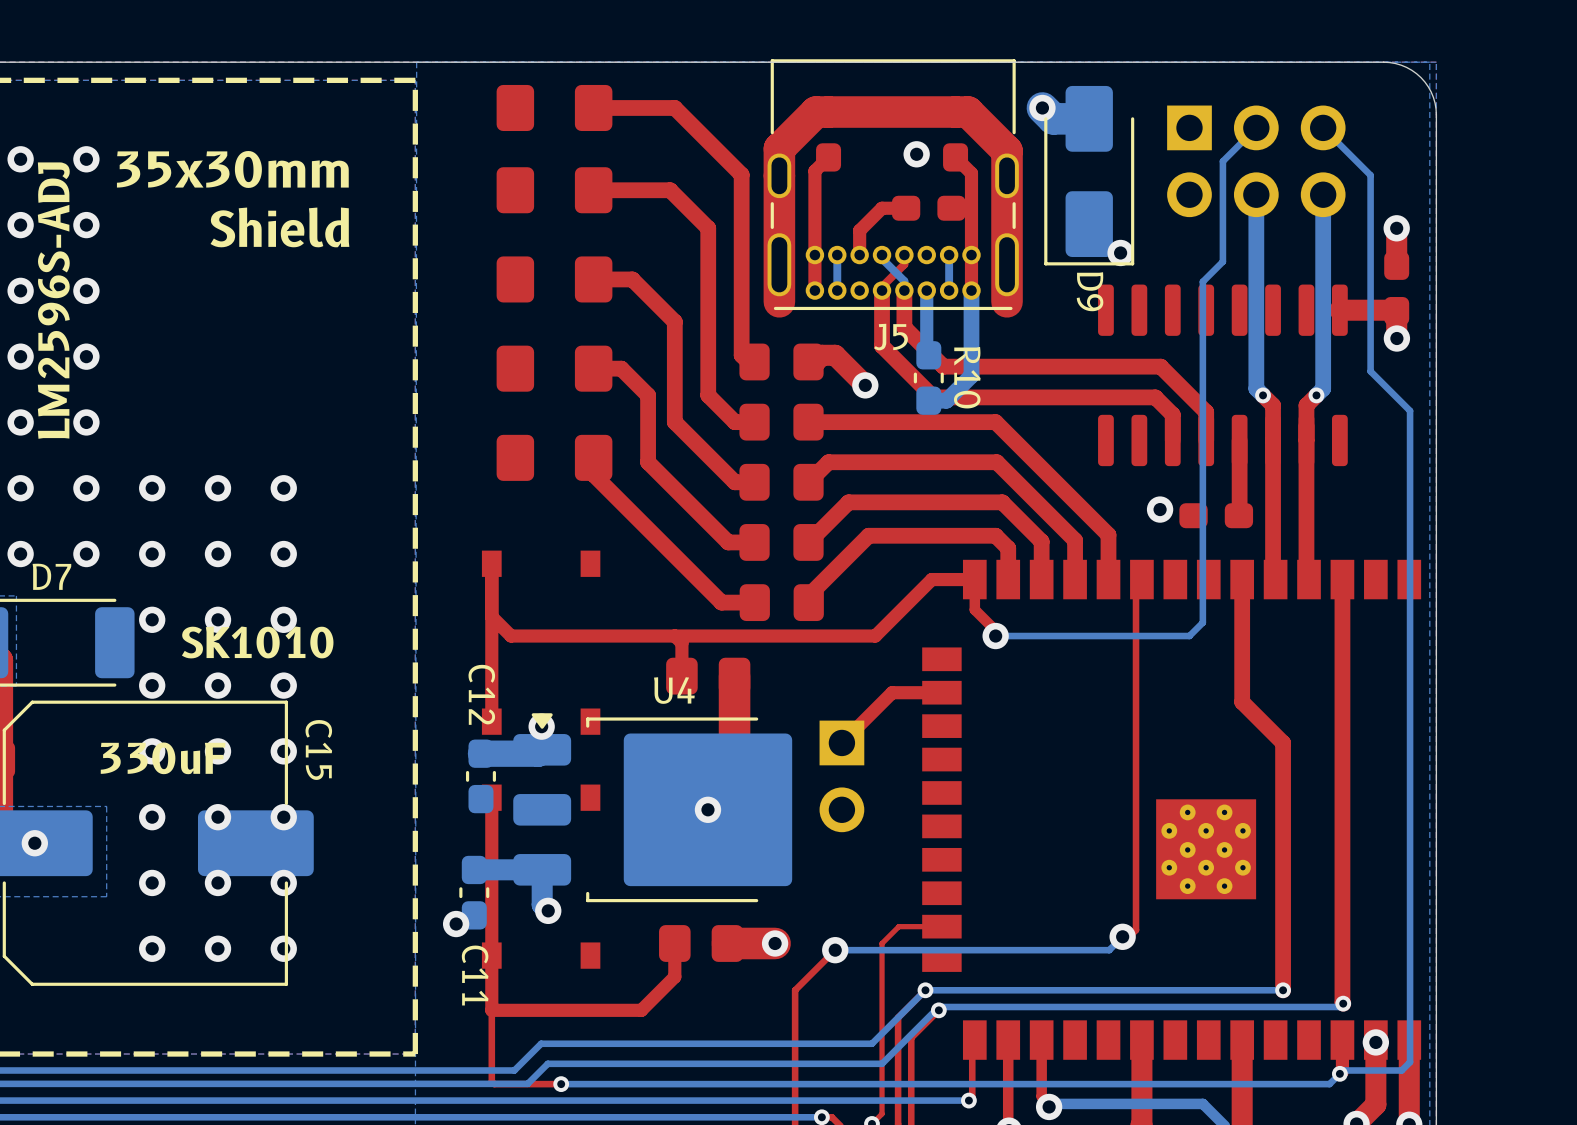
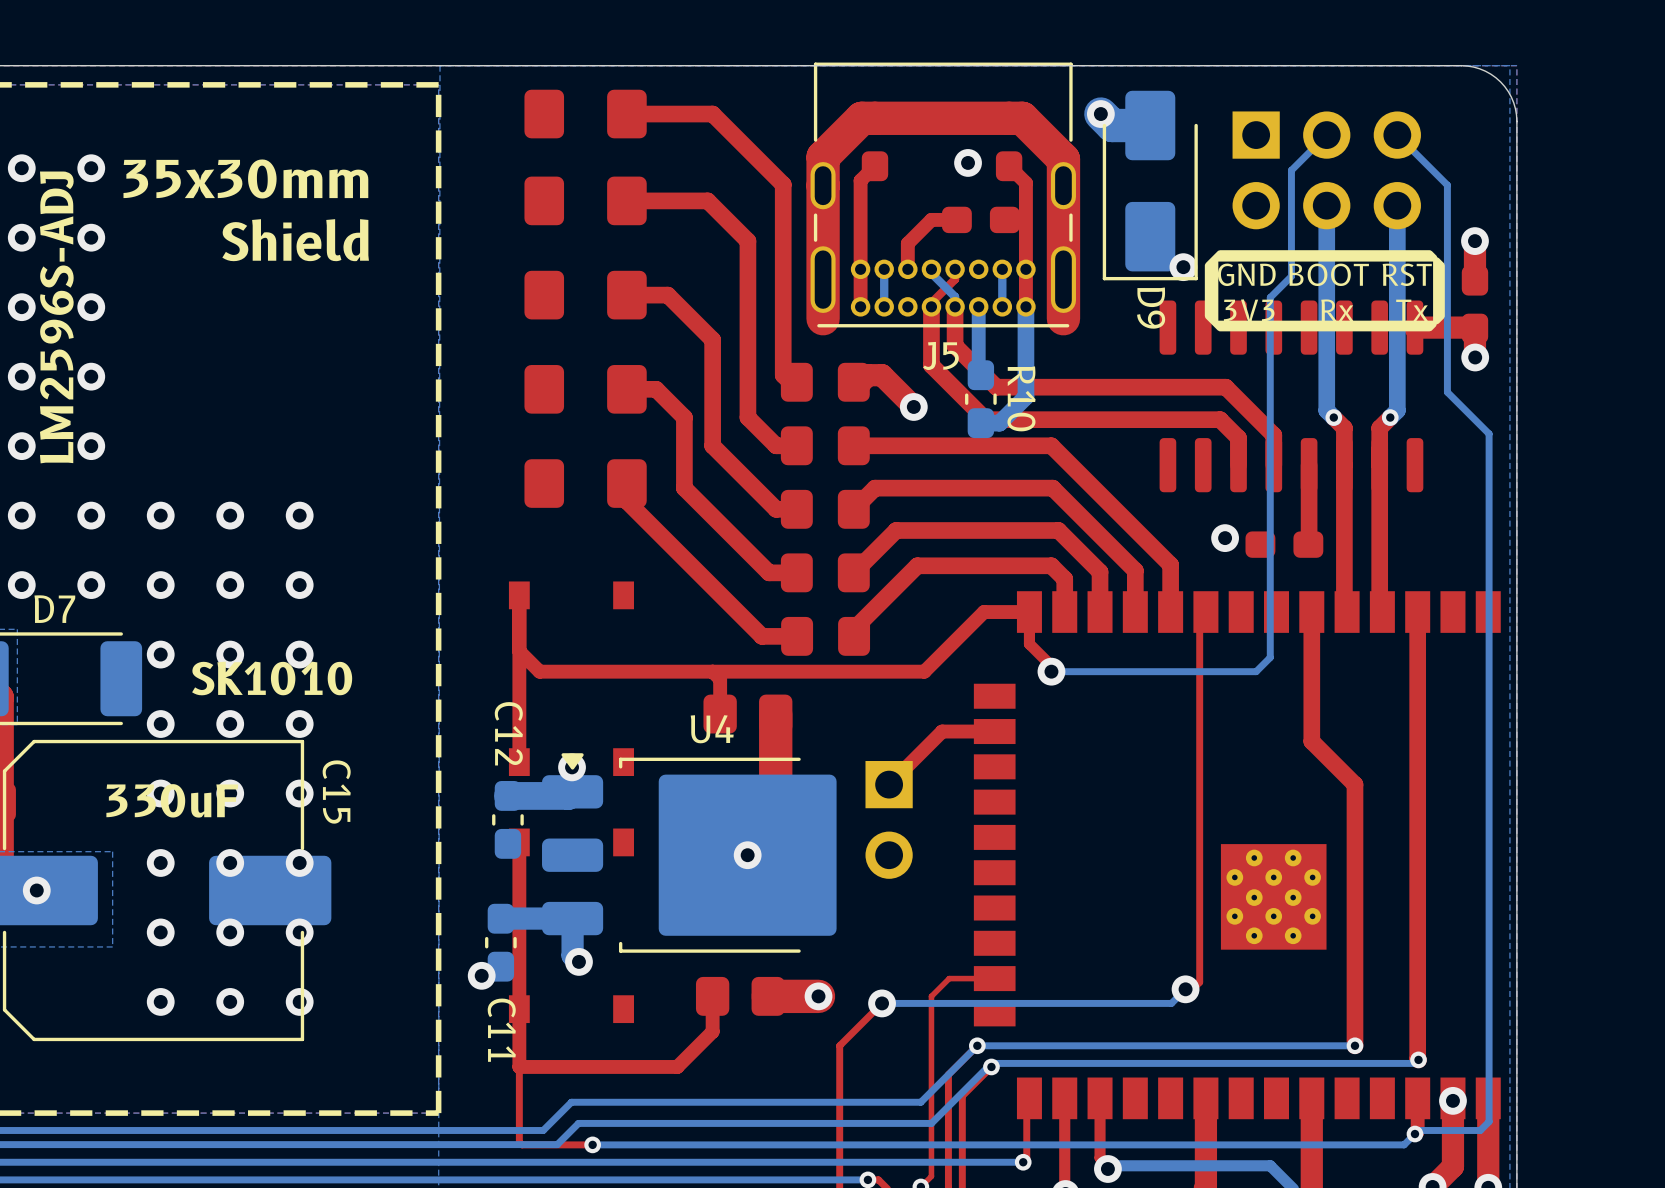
drawing: none -> [1204, 250, 1445, 332]
text: none -> GND BOOT RST (1324, 274)
text: none -> 3V3 Rx Tx (1326, 310)

